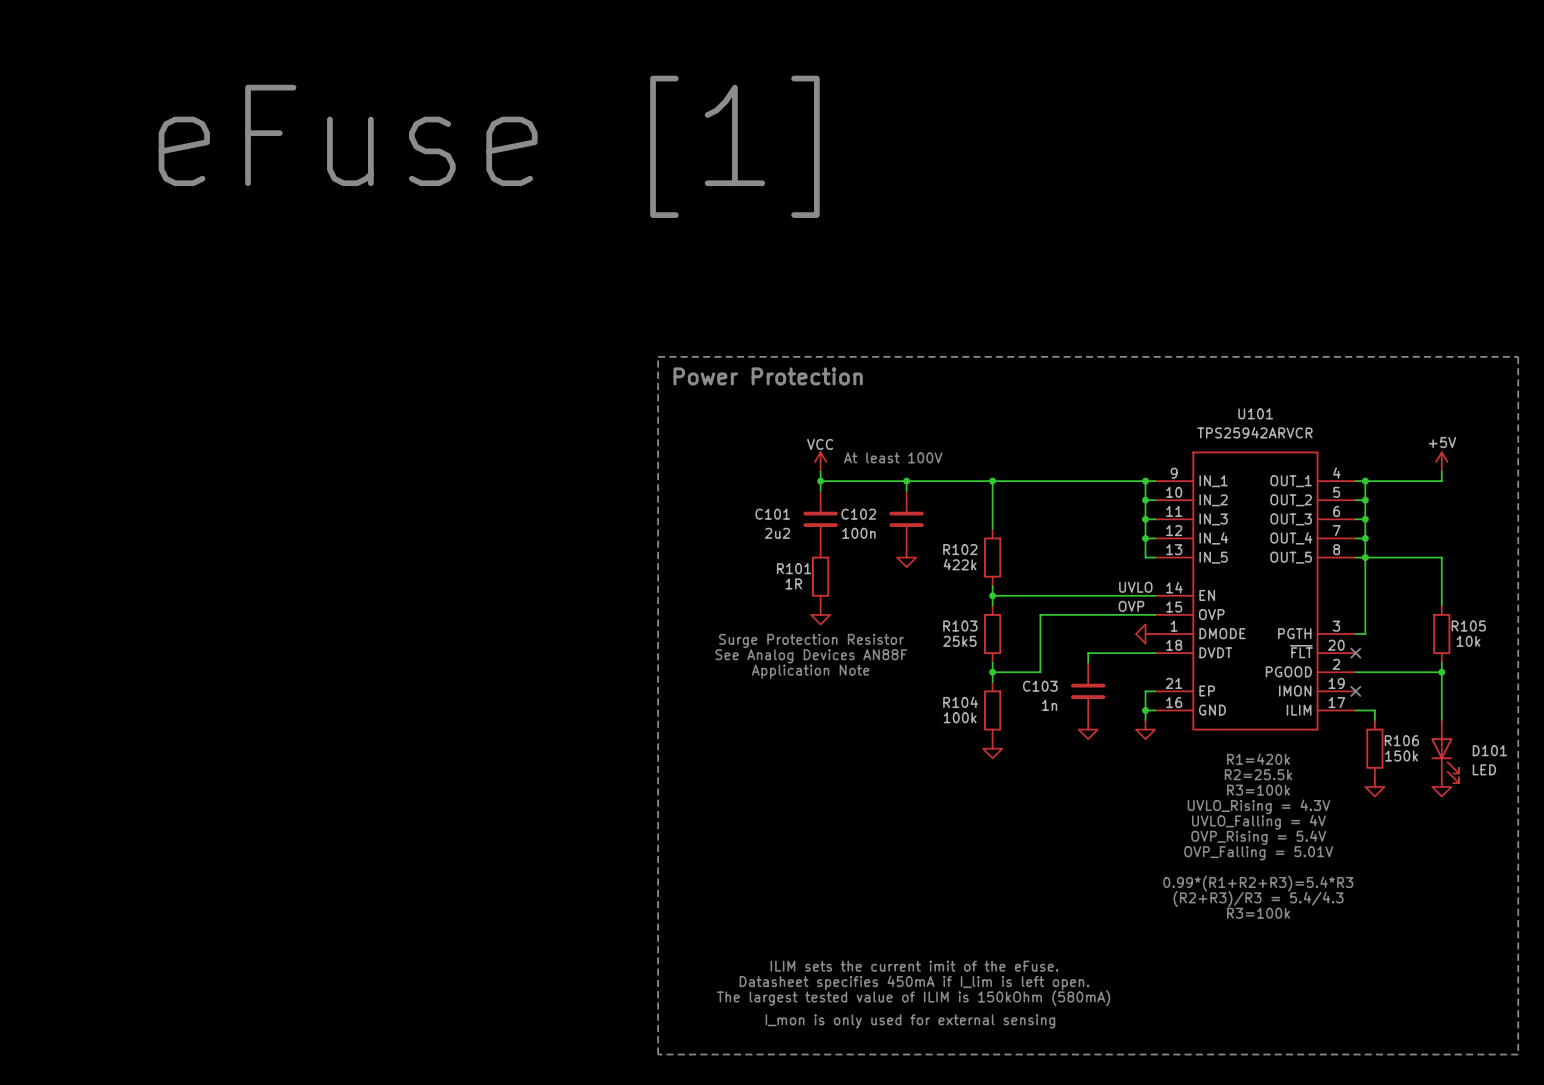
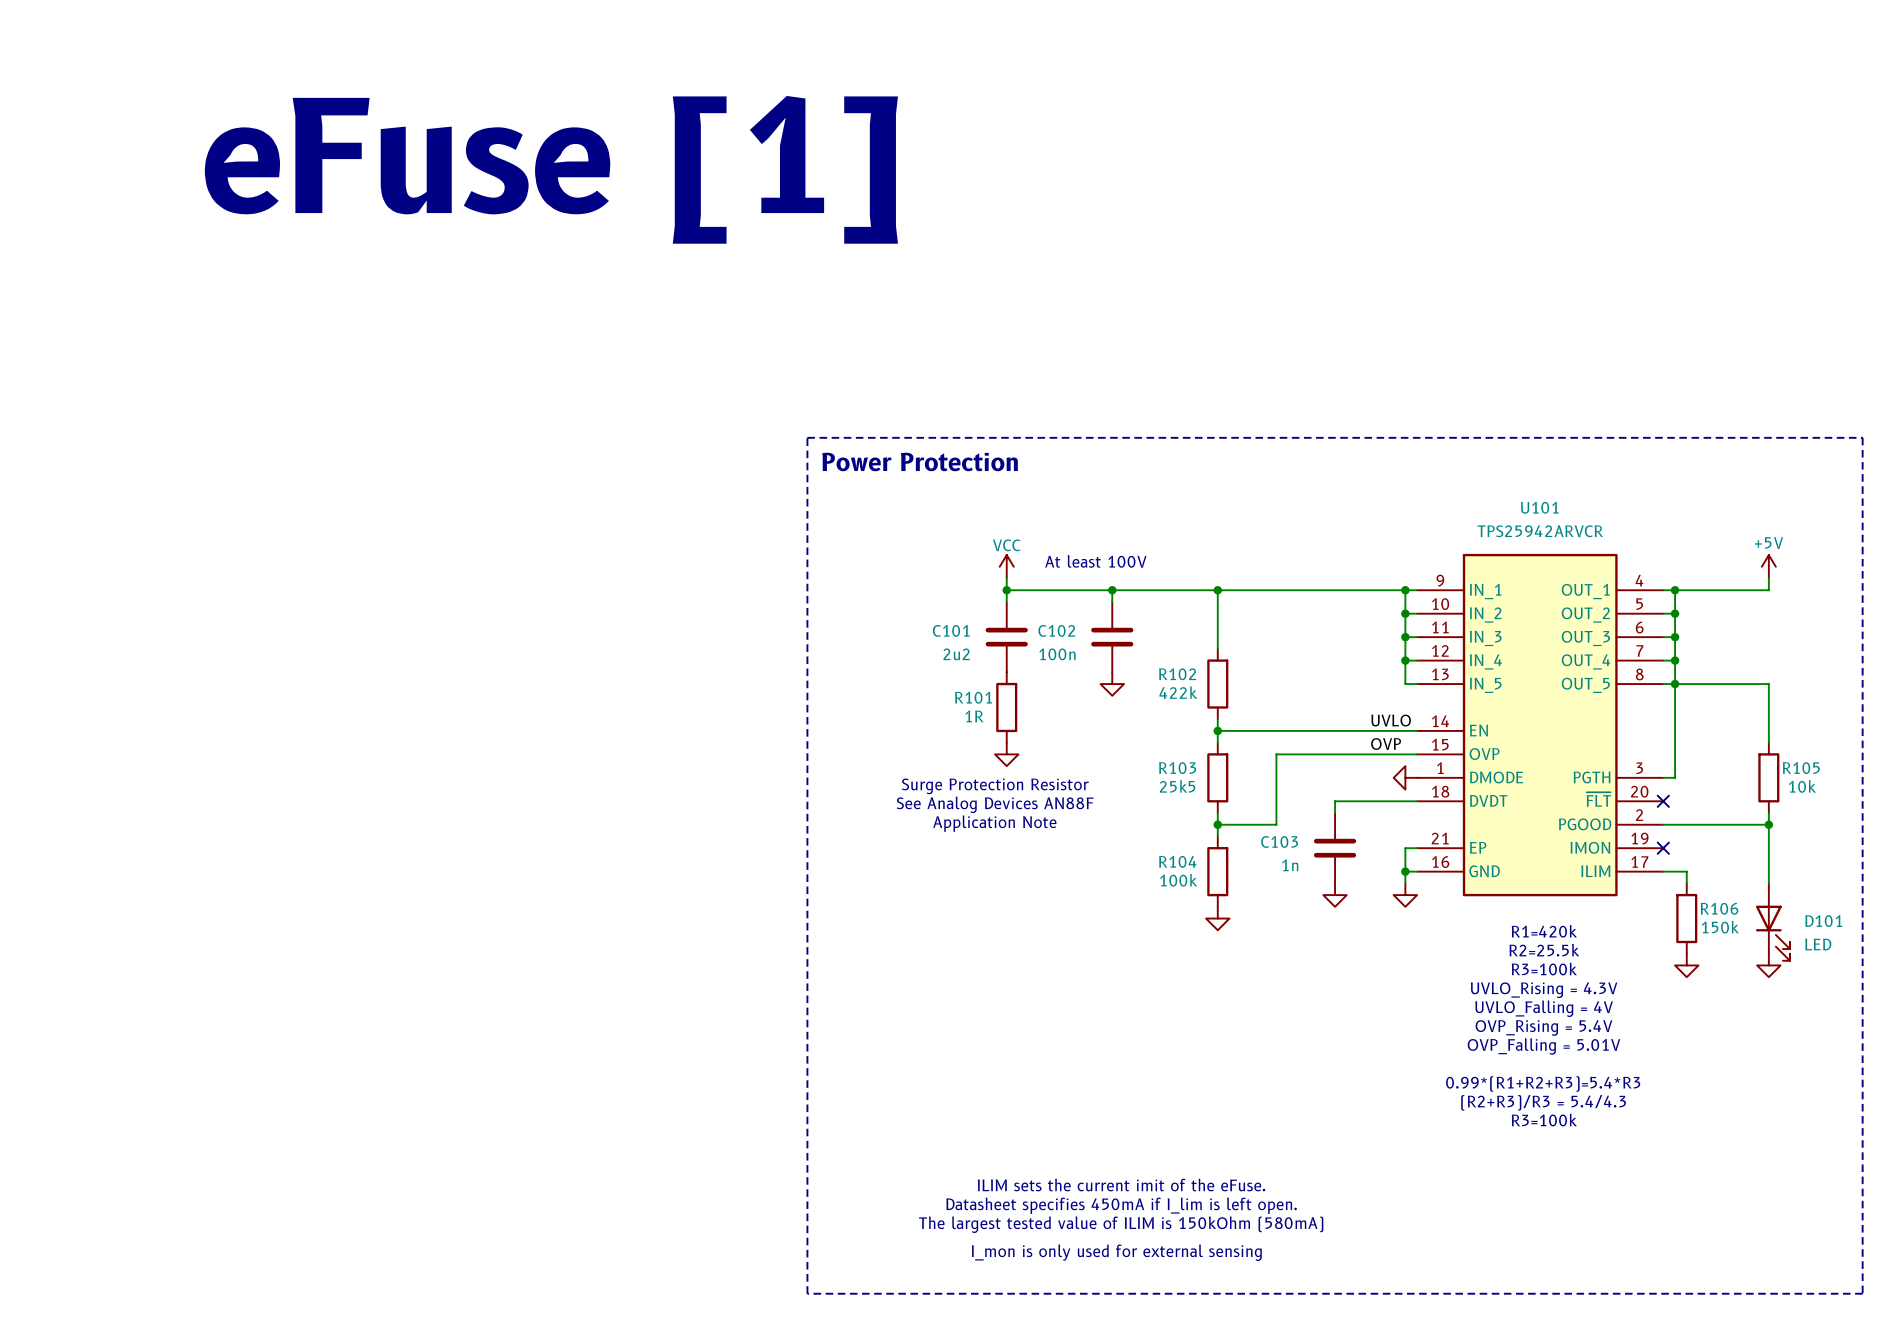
text position: eFuse [1] (489, 146) -> eFuse [1] (551, 169)

